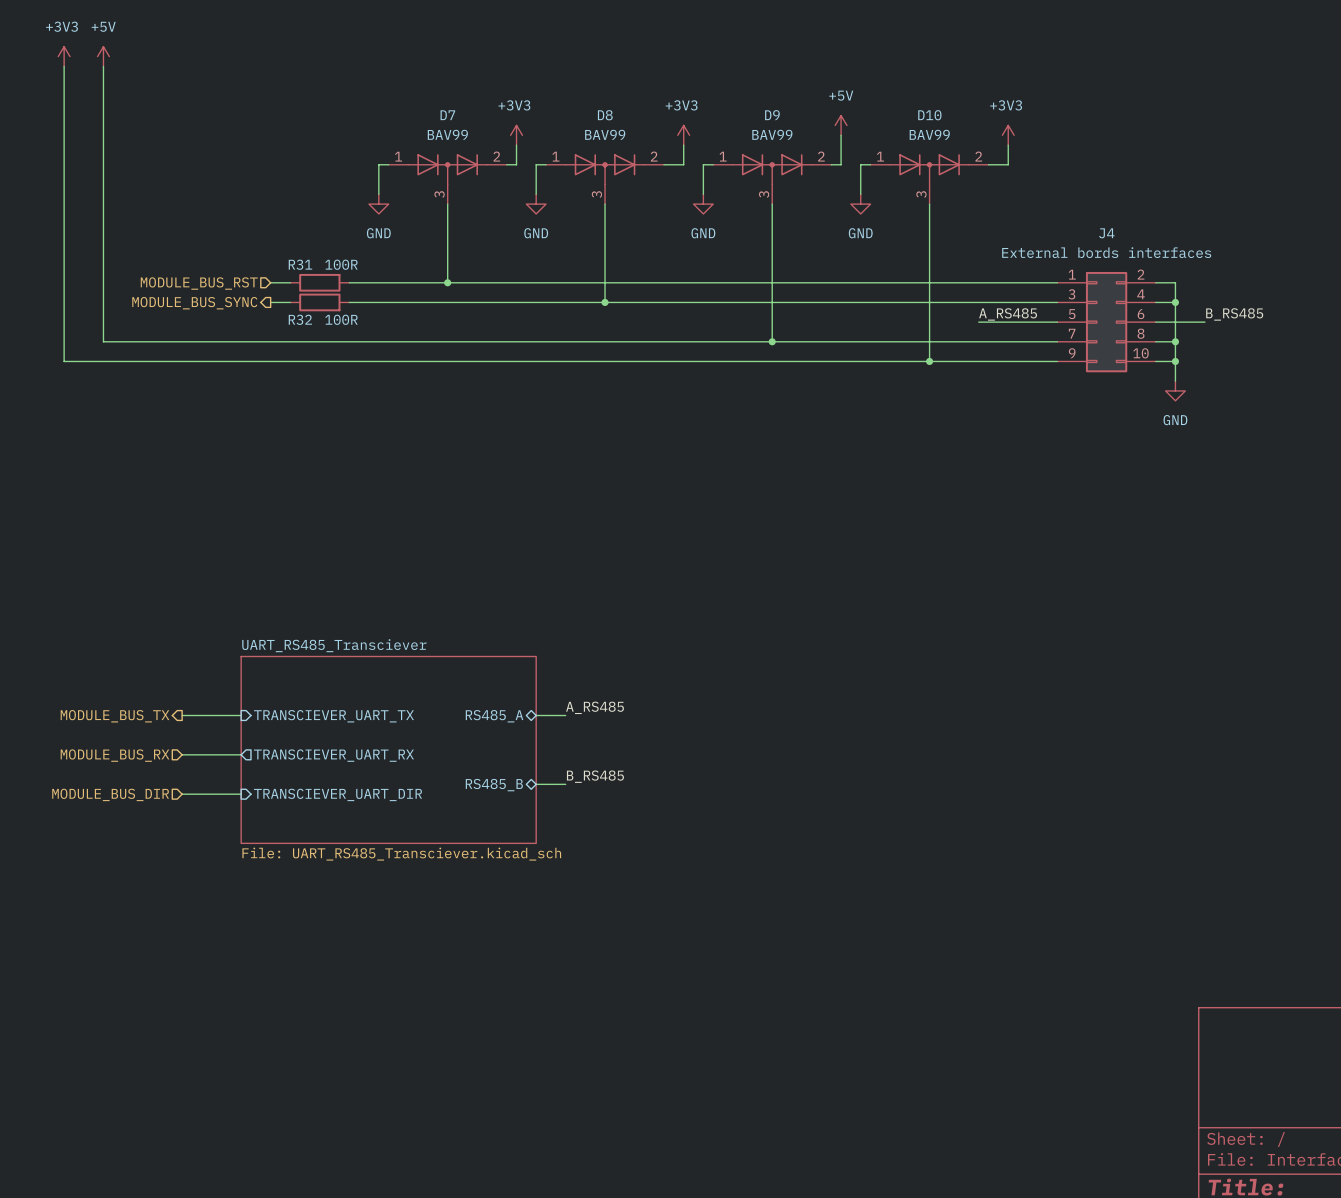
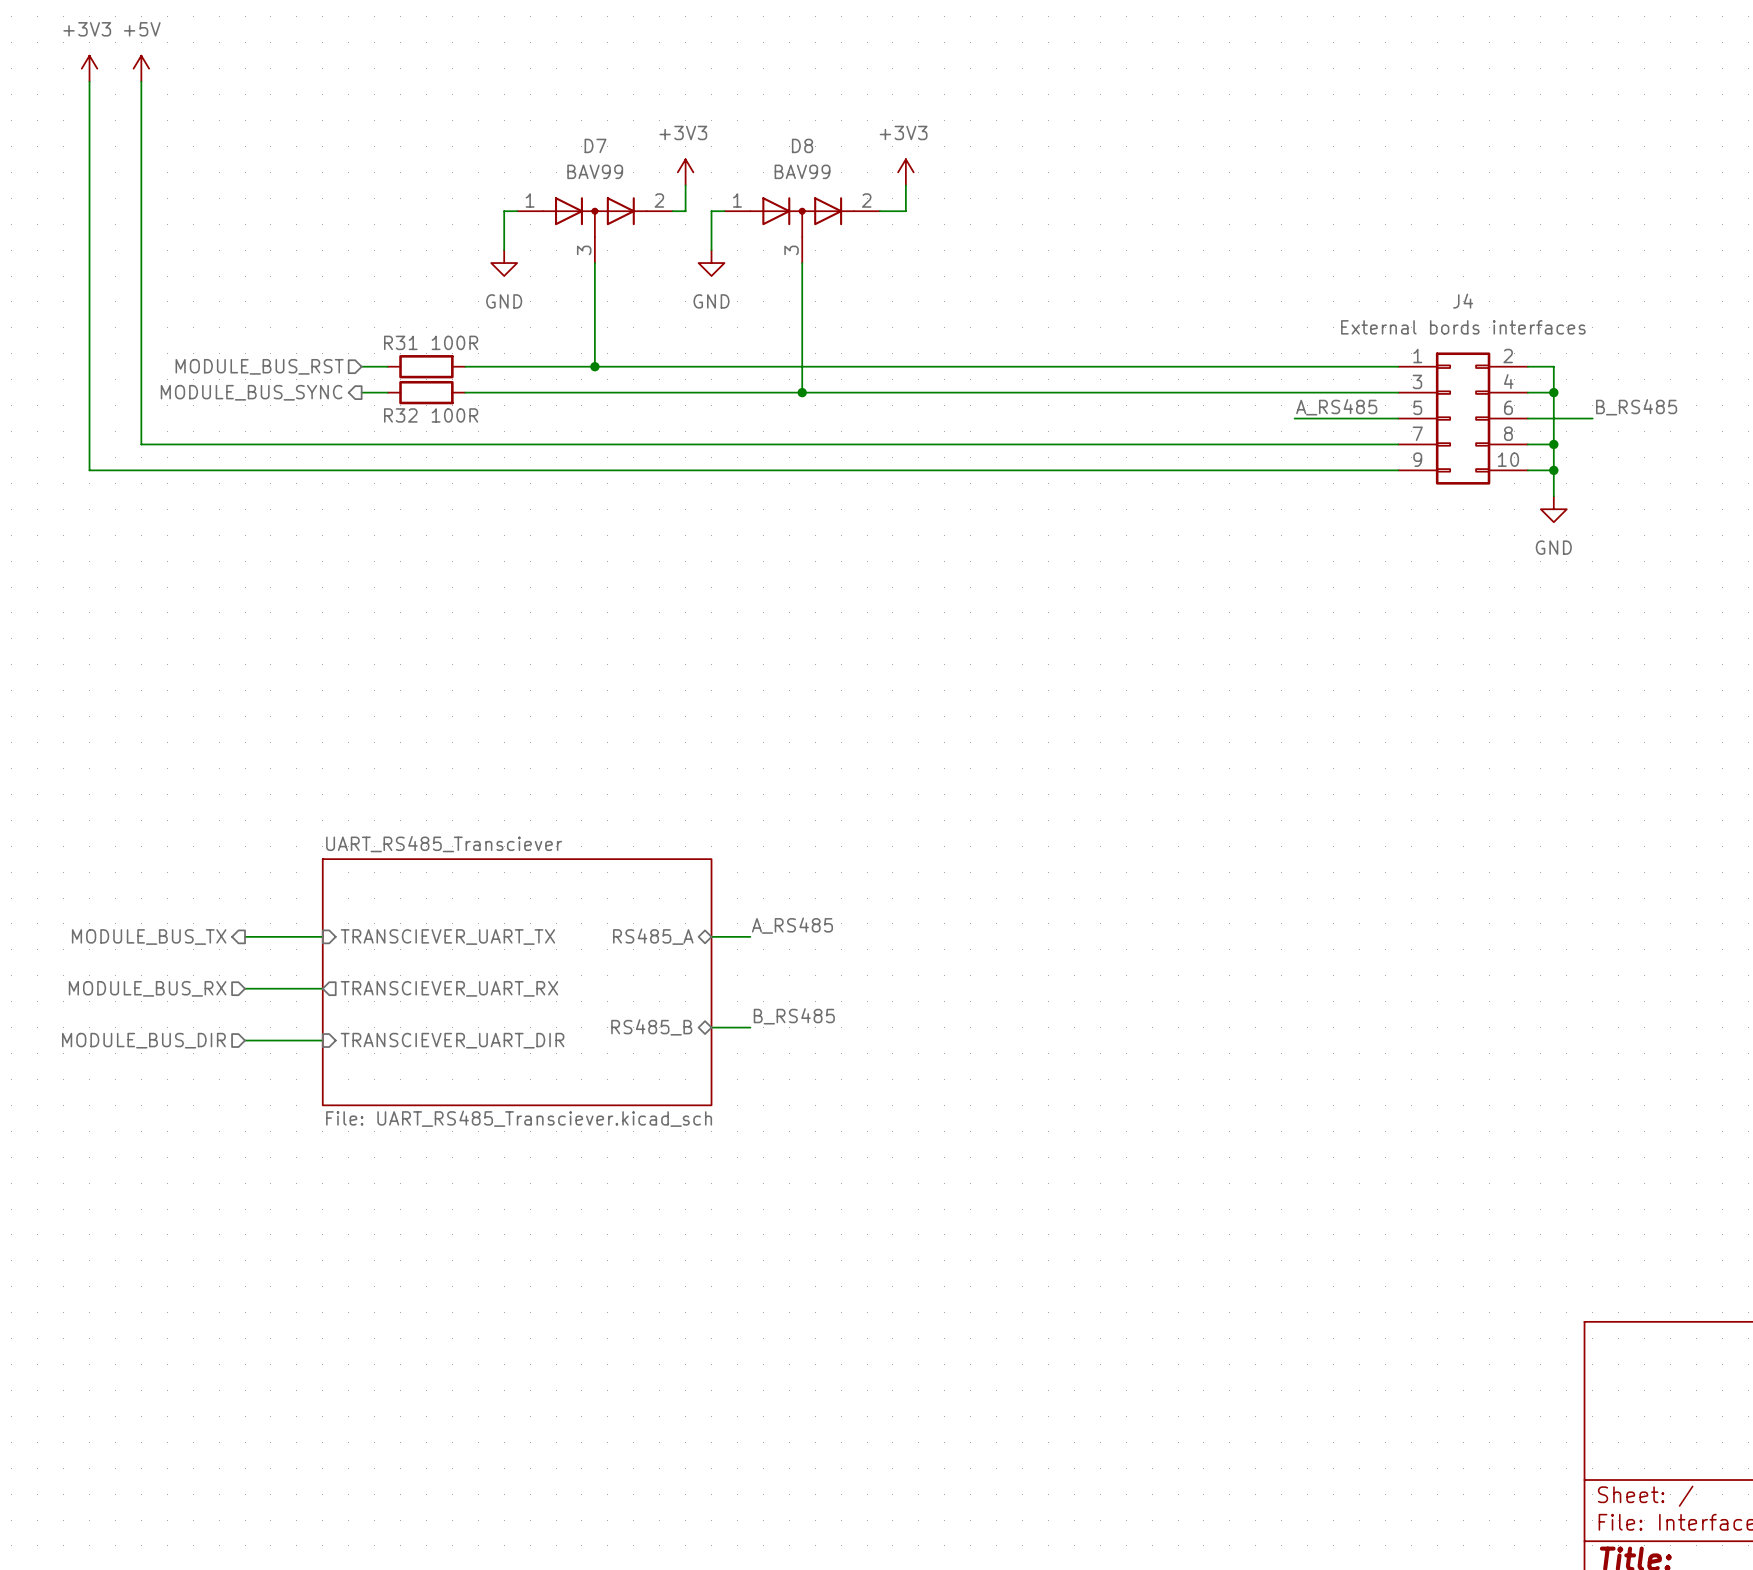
power symbol: +5V (841, 125) -> none
wire: (841, 135) (841, 164) (831, 164) -> none
power symbol: +3V3 (1008, 135) -> none
wire: (1008, 145) (1008, 164) (988, 164) -> none
wire: (713, 164) (703, 164) (703, 194) -> none
wire: (870, 164) (860, 164) (860, 194) -> none
D9: BAV99 (772, 179) -> none
D10: BAV99 (929, 179) -> none
power symbol: GND (703, 204) -> none
wire: (772, 204) (772, 341) -> none
power symbol: GND (860, 204) -> none
wire: (929, 204) (929, 361) -> none
junction: (772, 341) -> none
junction: (929, 361) -> none

